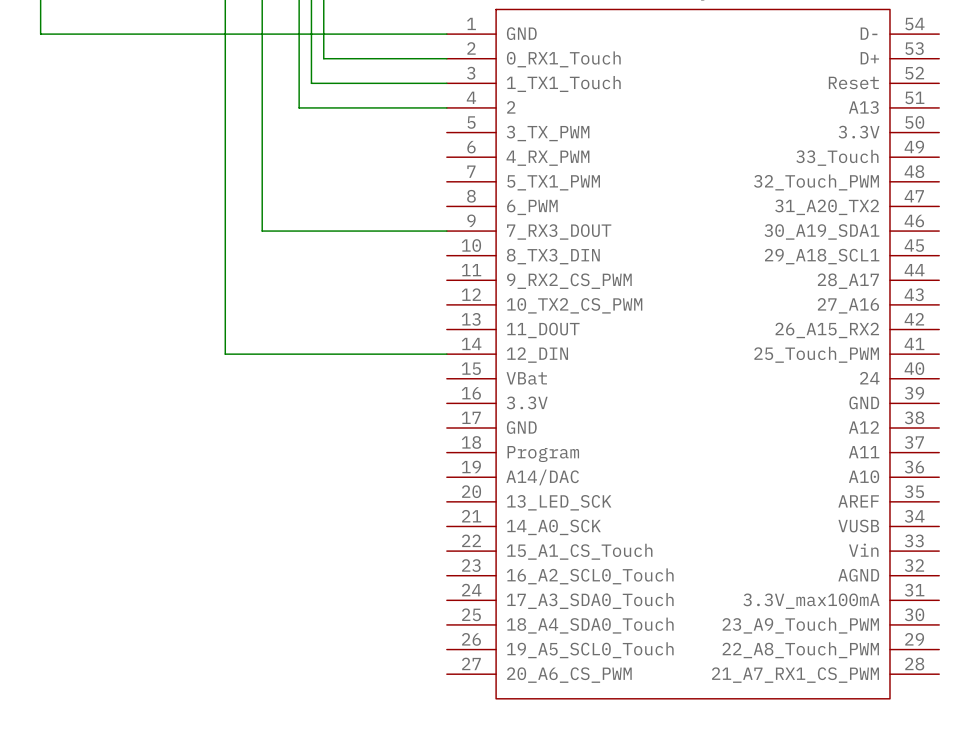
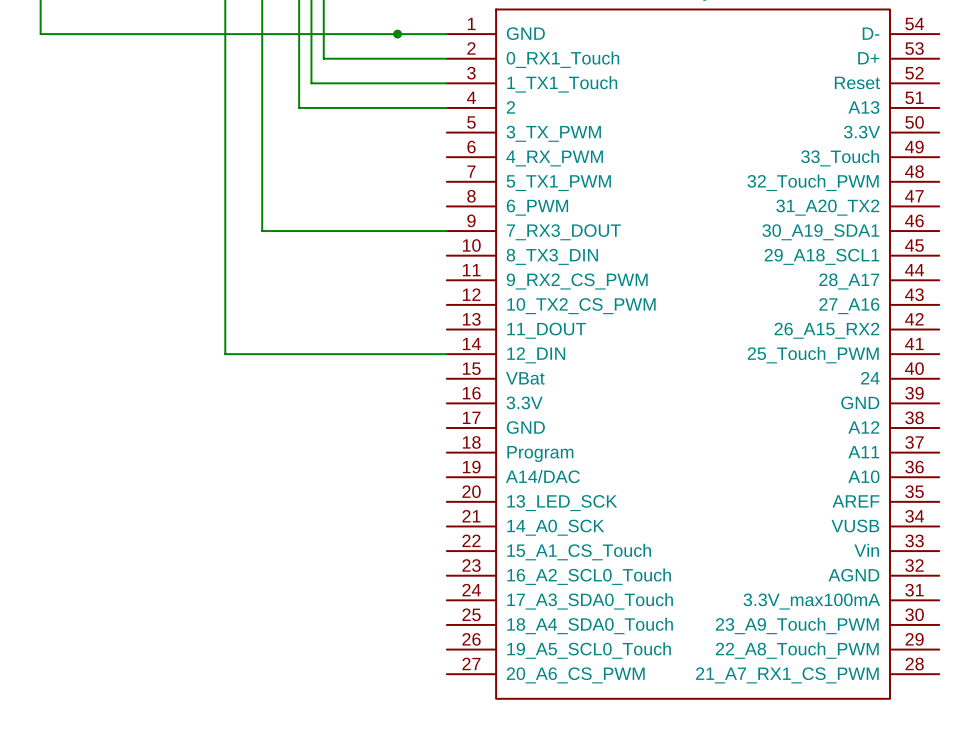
junction: none -> (397, 34)

